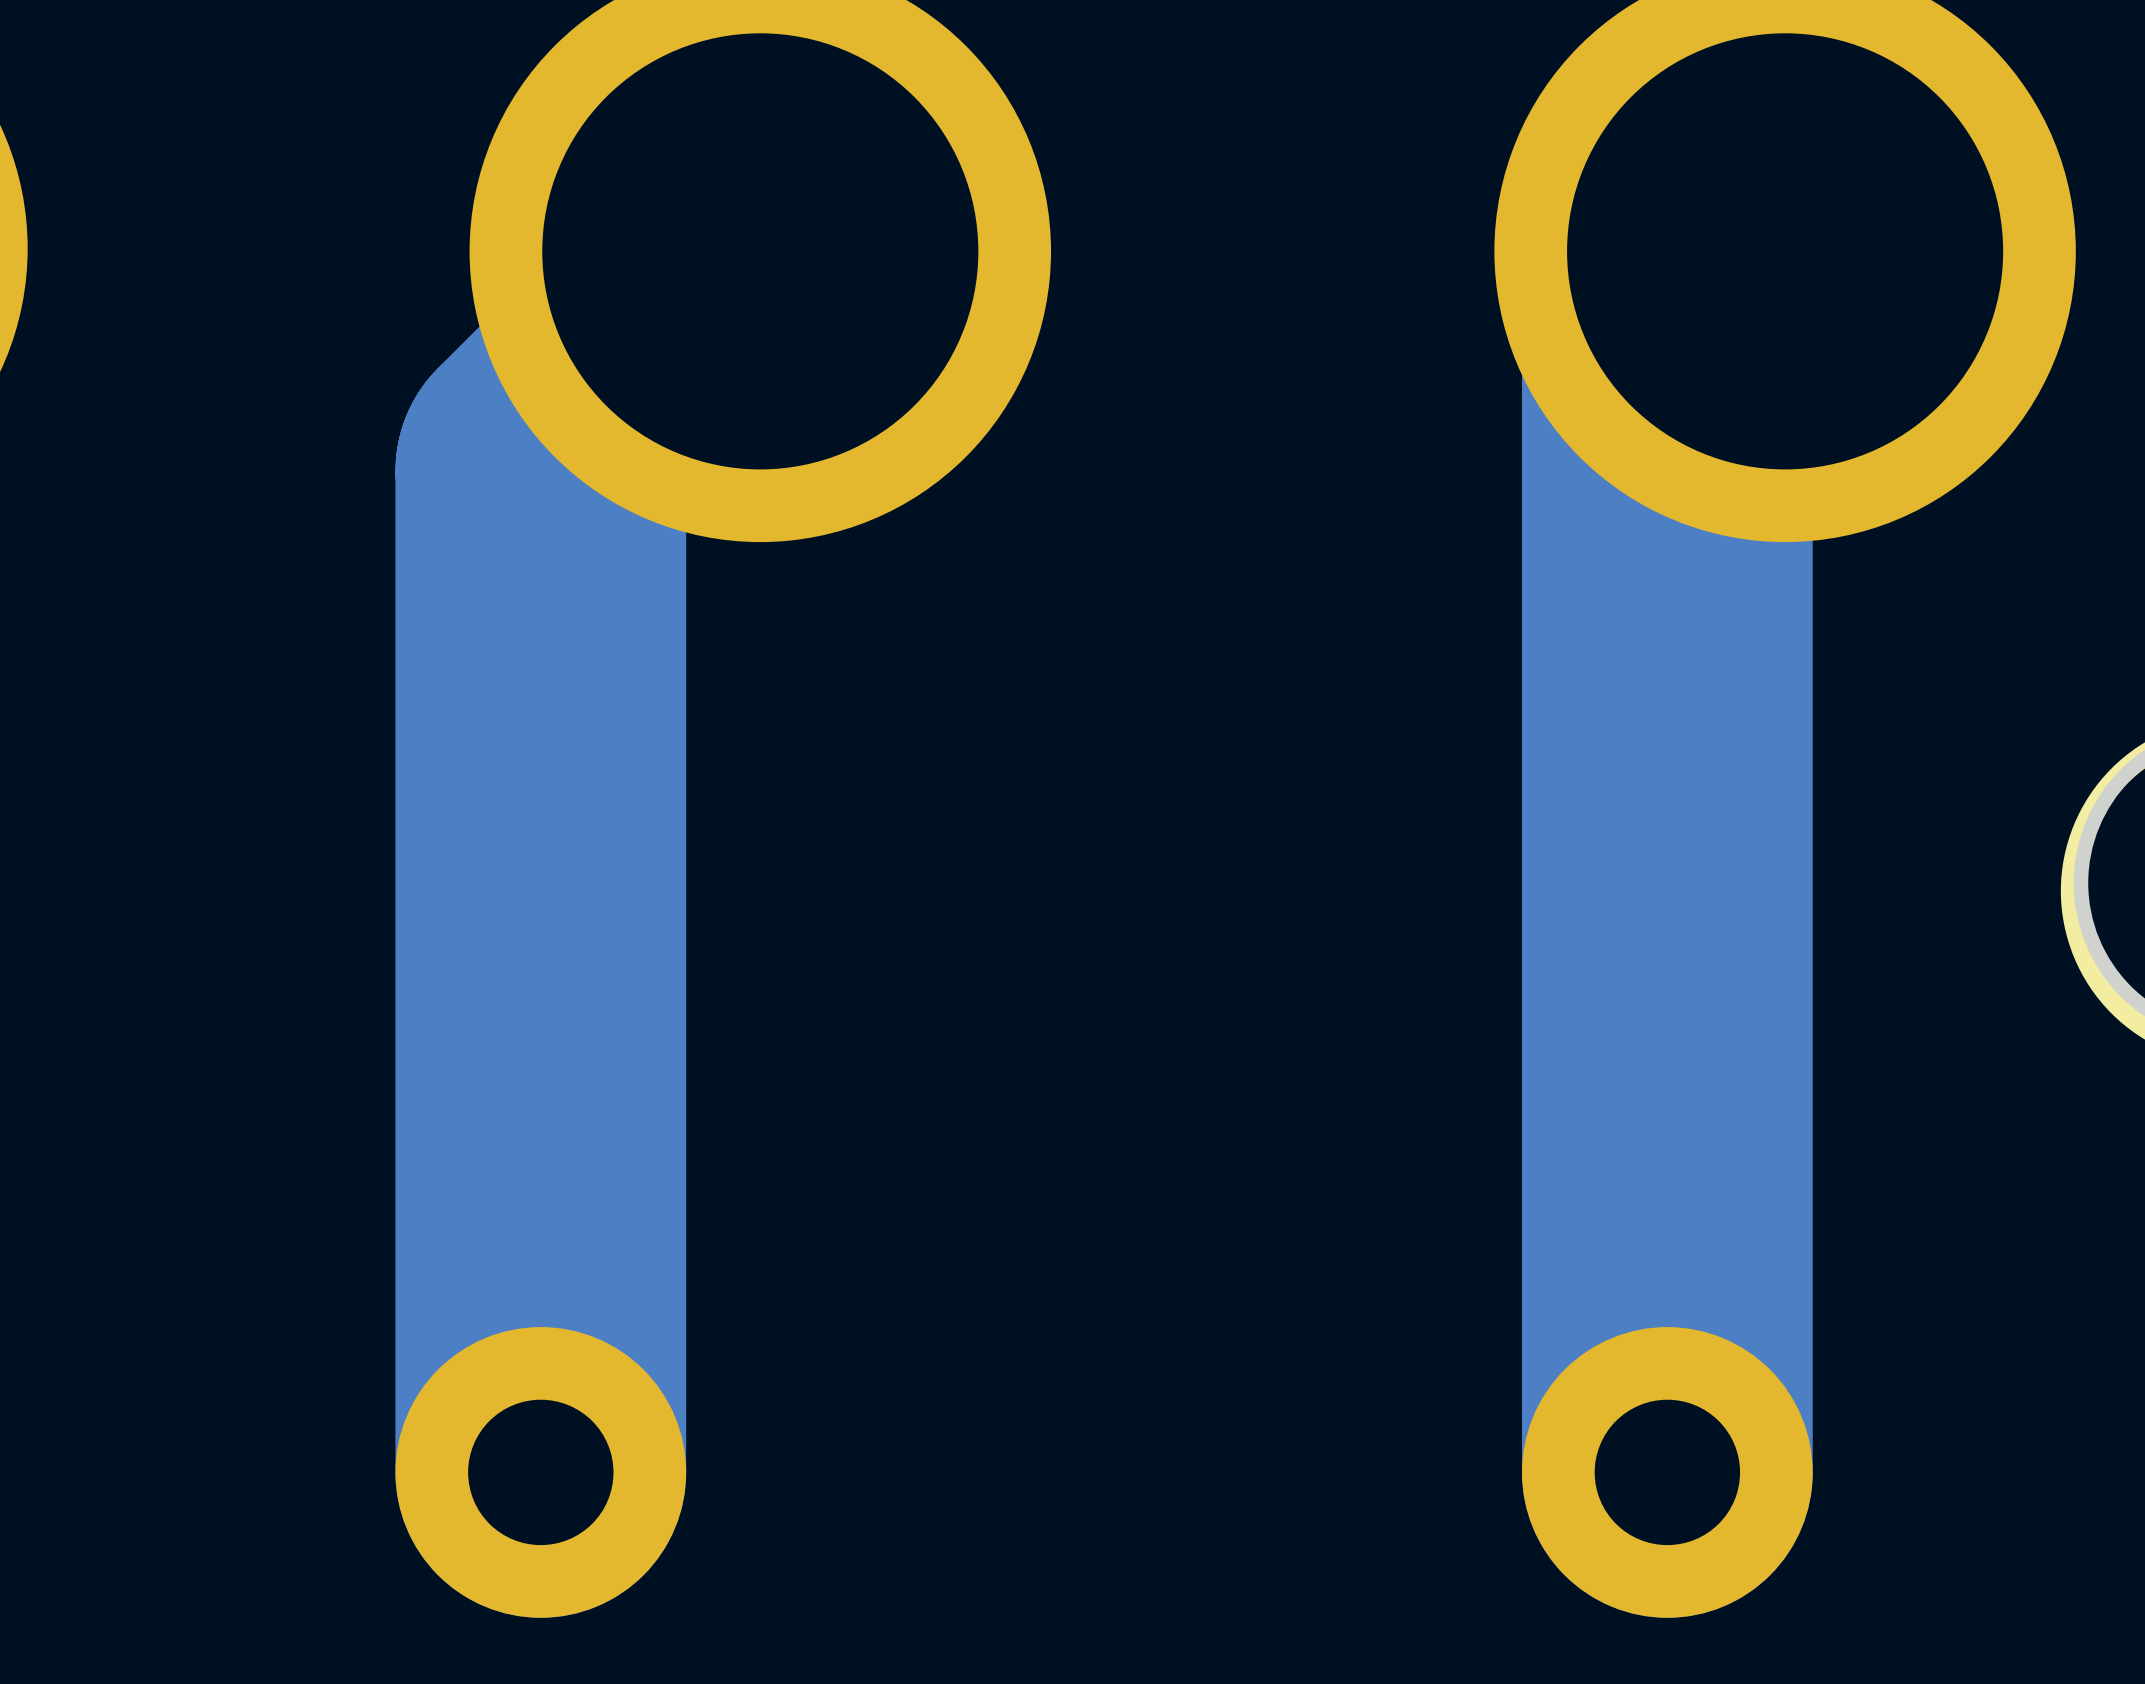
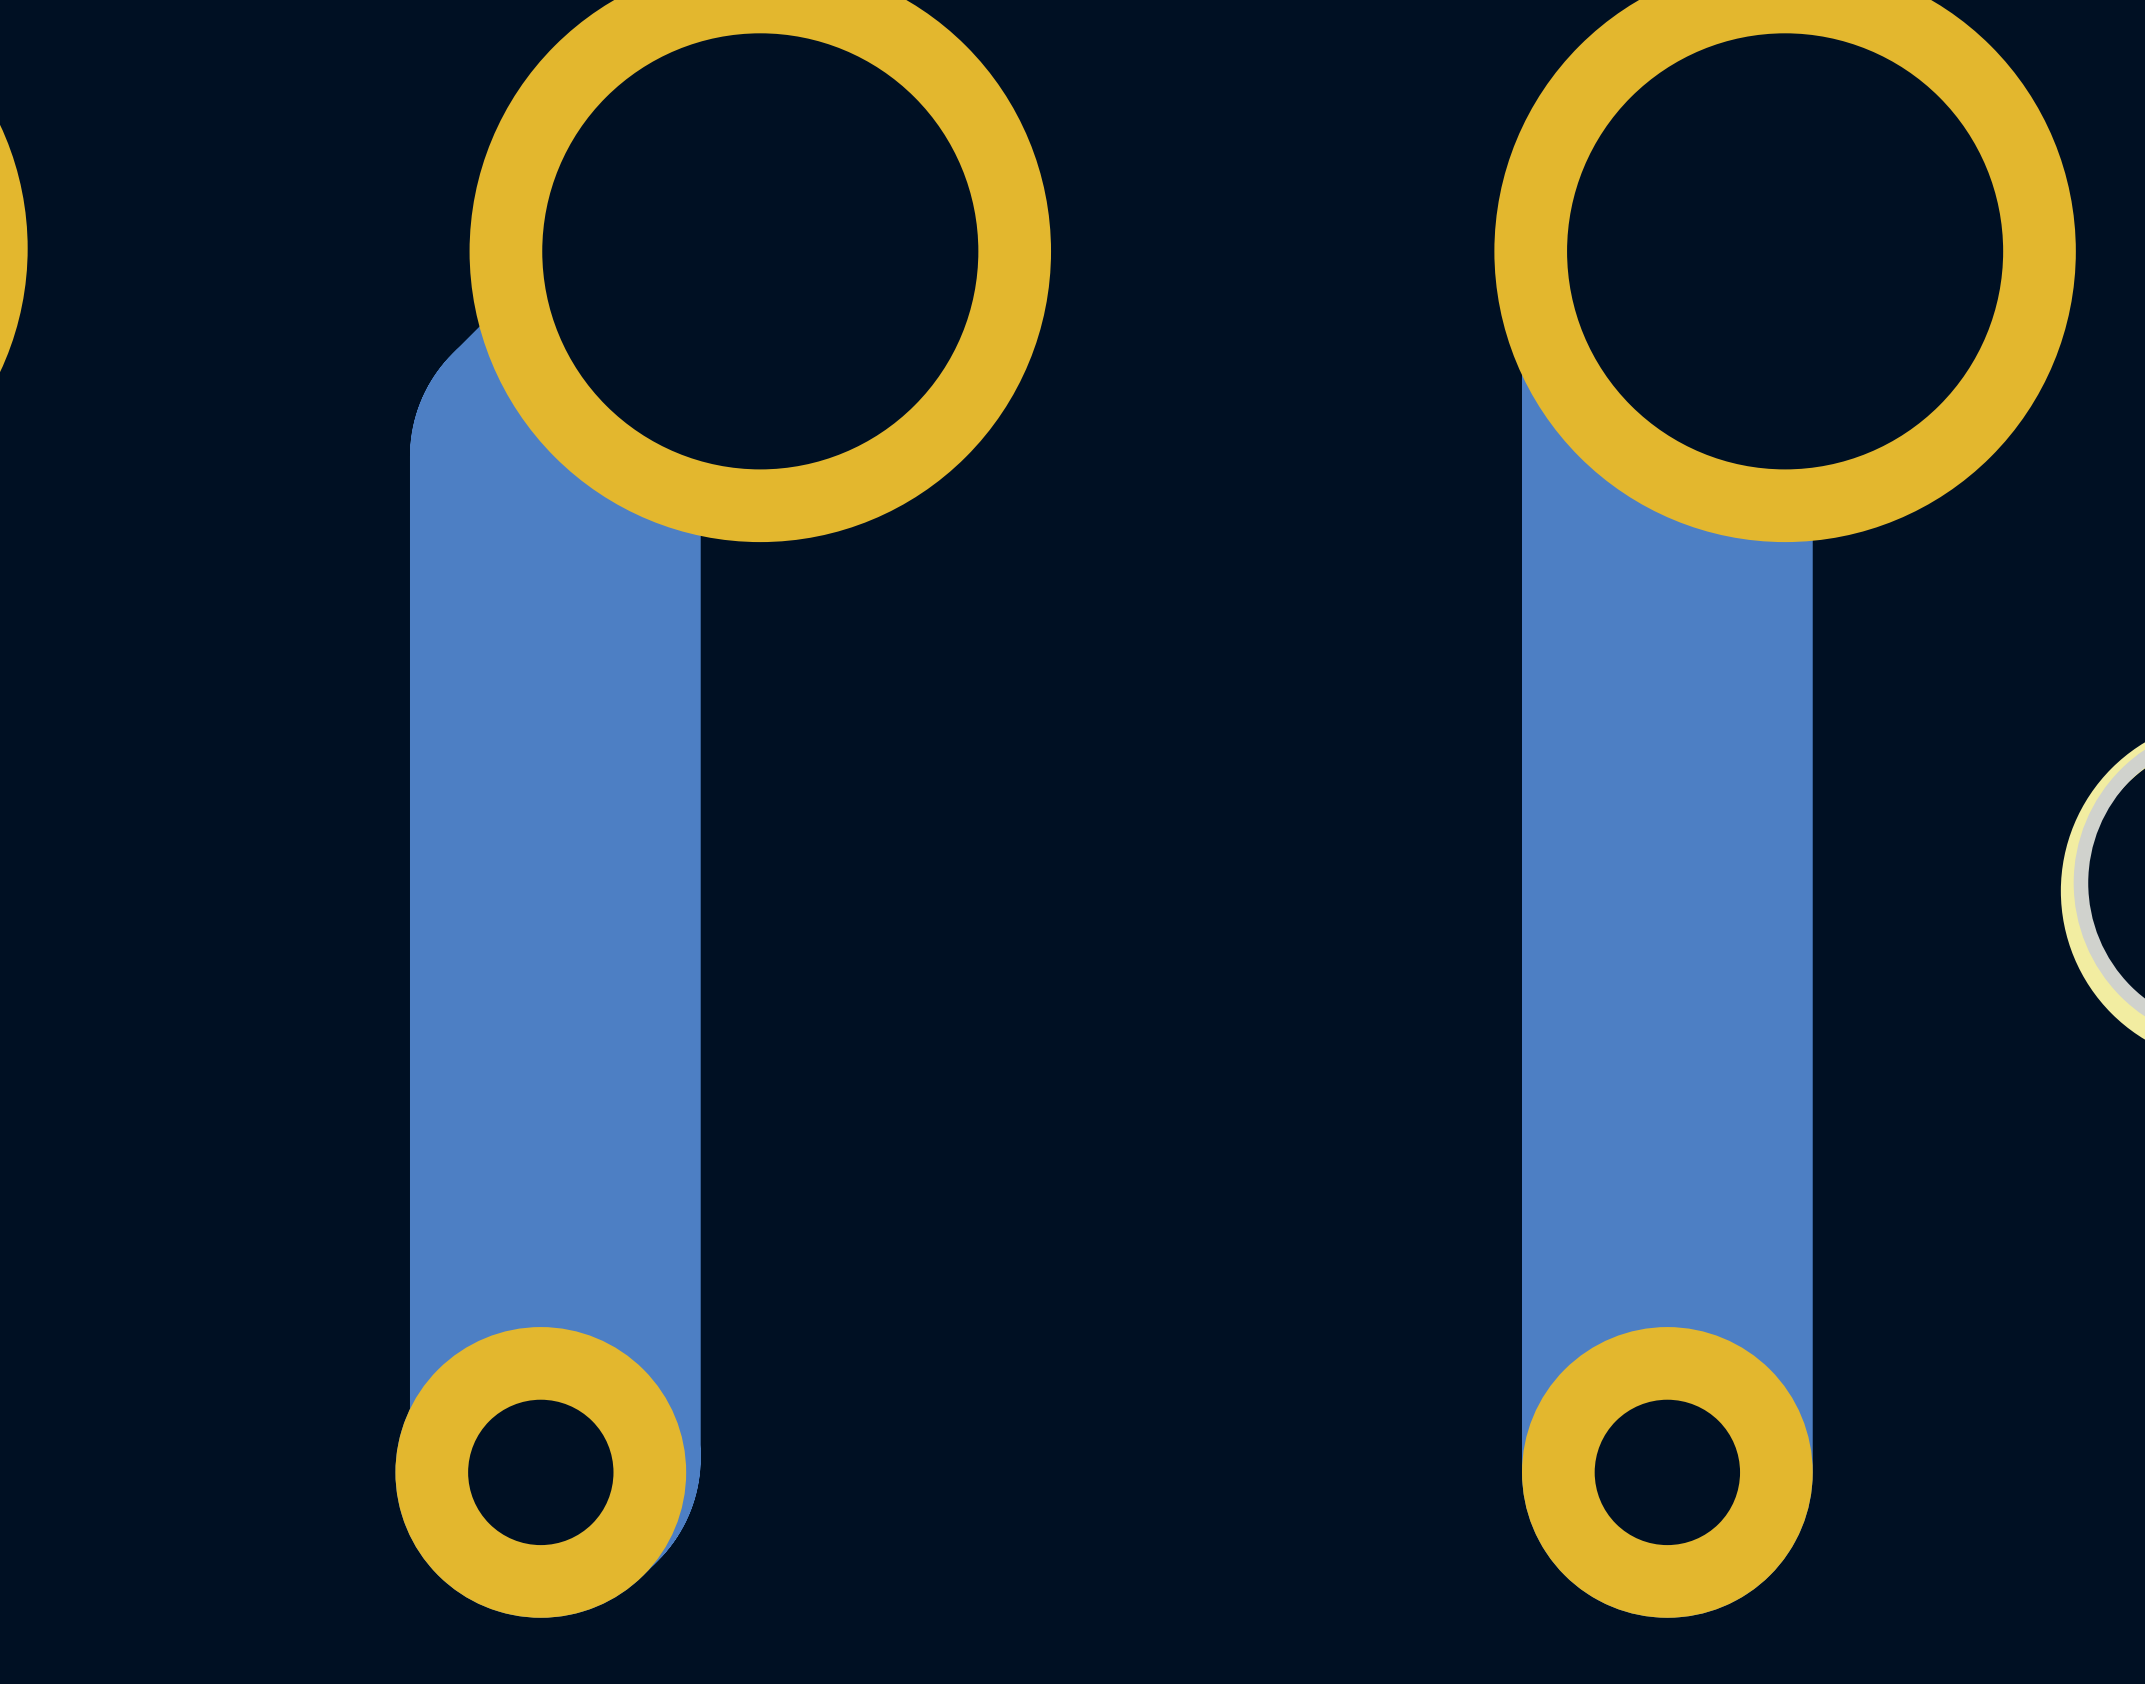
bottom track: (555, 456) (540, 470) (540, 1472) -> (555, 456) (555, 1457) (540, 1472)

